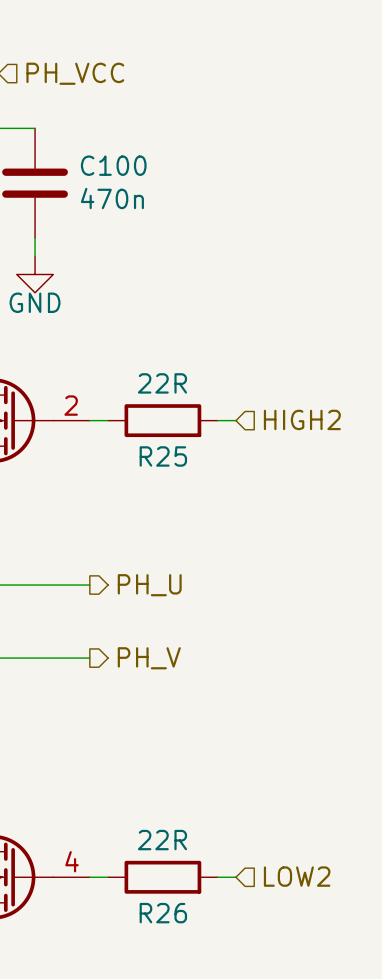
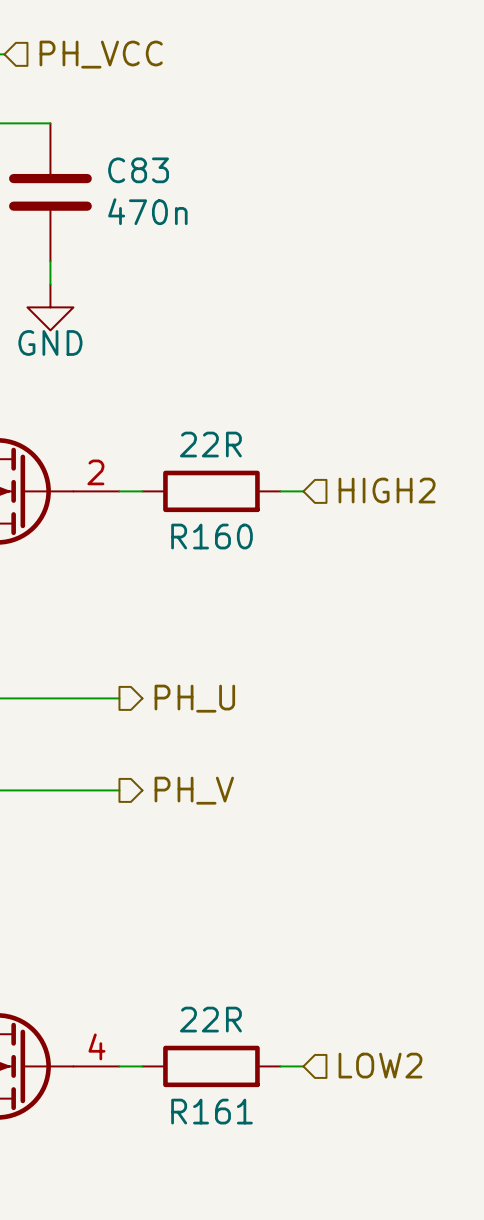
C100 name: C100 (113, 165) -> C83 (138, 170)
R25 name: R25 (163, 456) -> R160 (212, 536)
R26 name: R26 (163, 913) -> R161 (212, 1111)

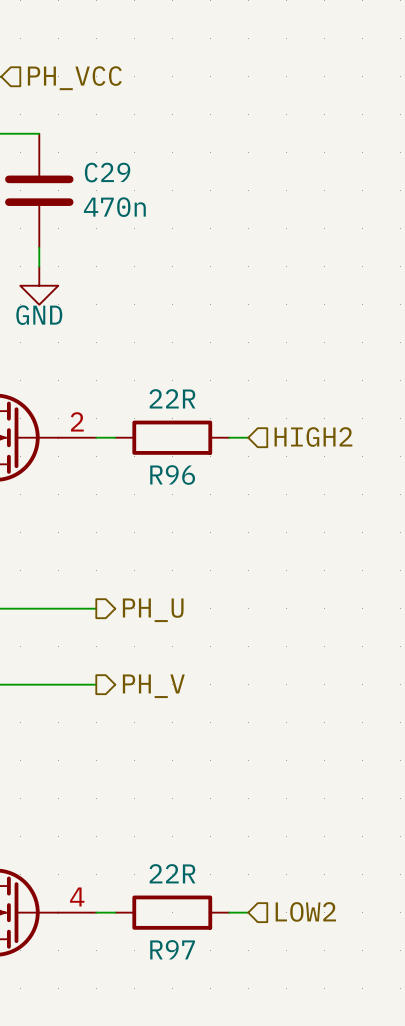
C83 name: C83 (138, 170) -> C29 (107, 172)
R160 name: R160 (212, 536) -> R96 (172, 474)
R161 name: R161 (212, 1111) -> R97 (172, 949)

